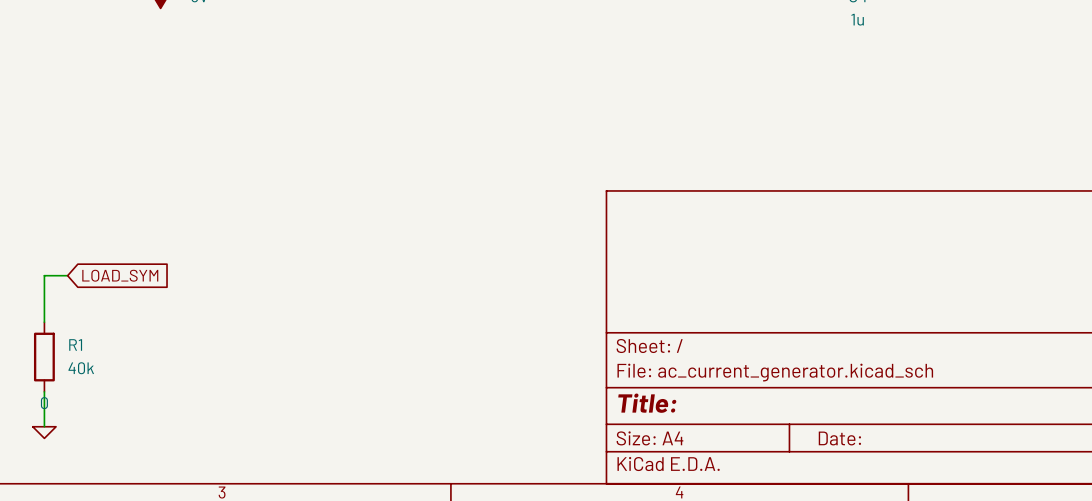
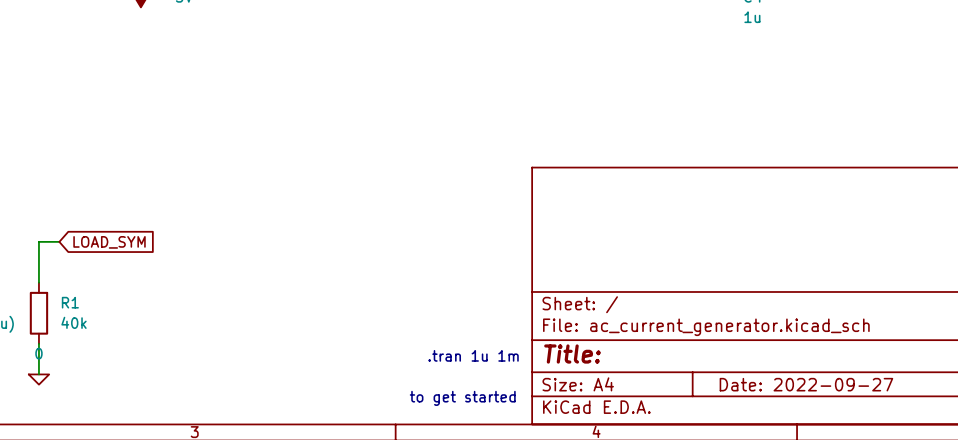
text: none -> .tran 1u 1m (473, 355)
title block: Date: (839, 438) -> Date: 2022-09-27 (806, 384)
text: none -> to get started (462, 398)

